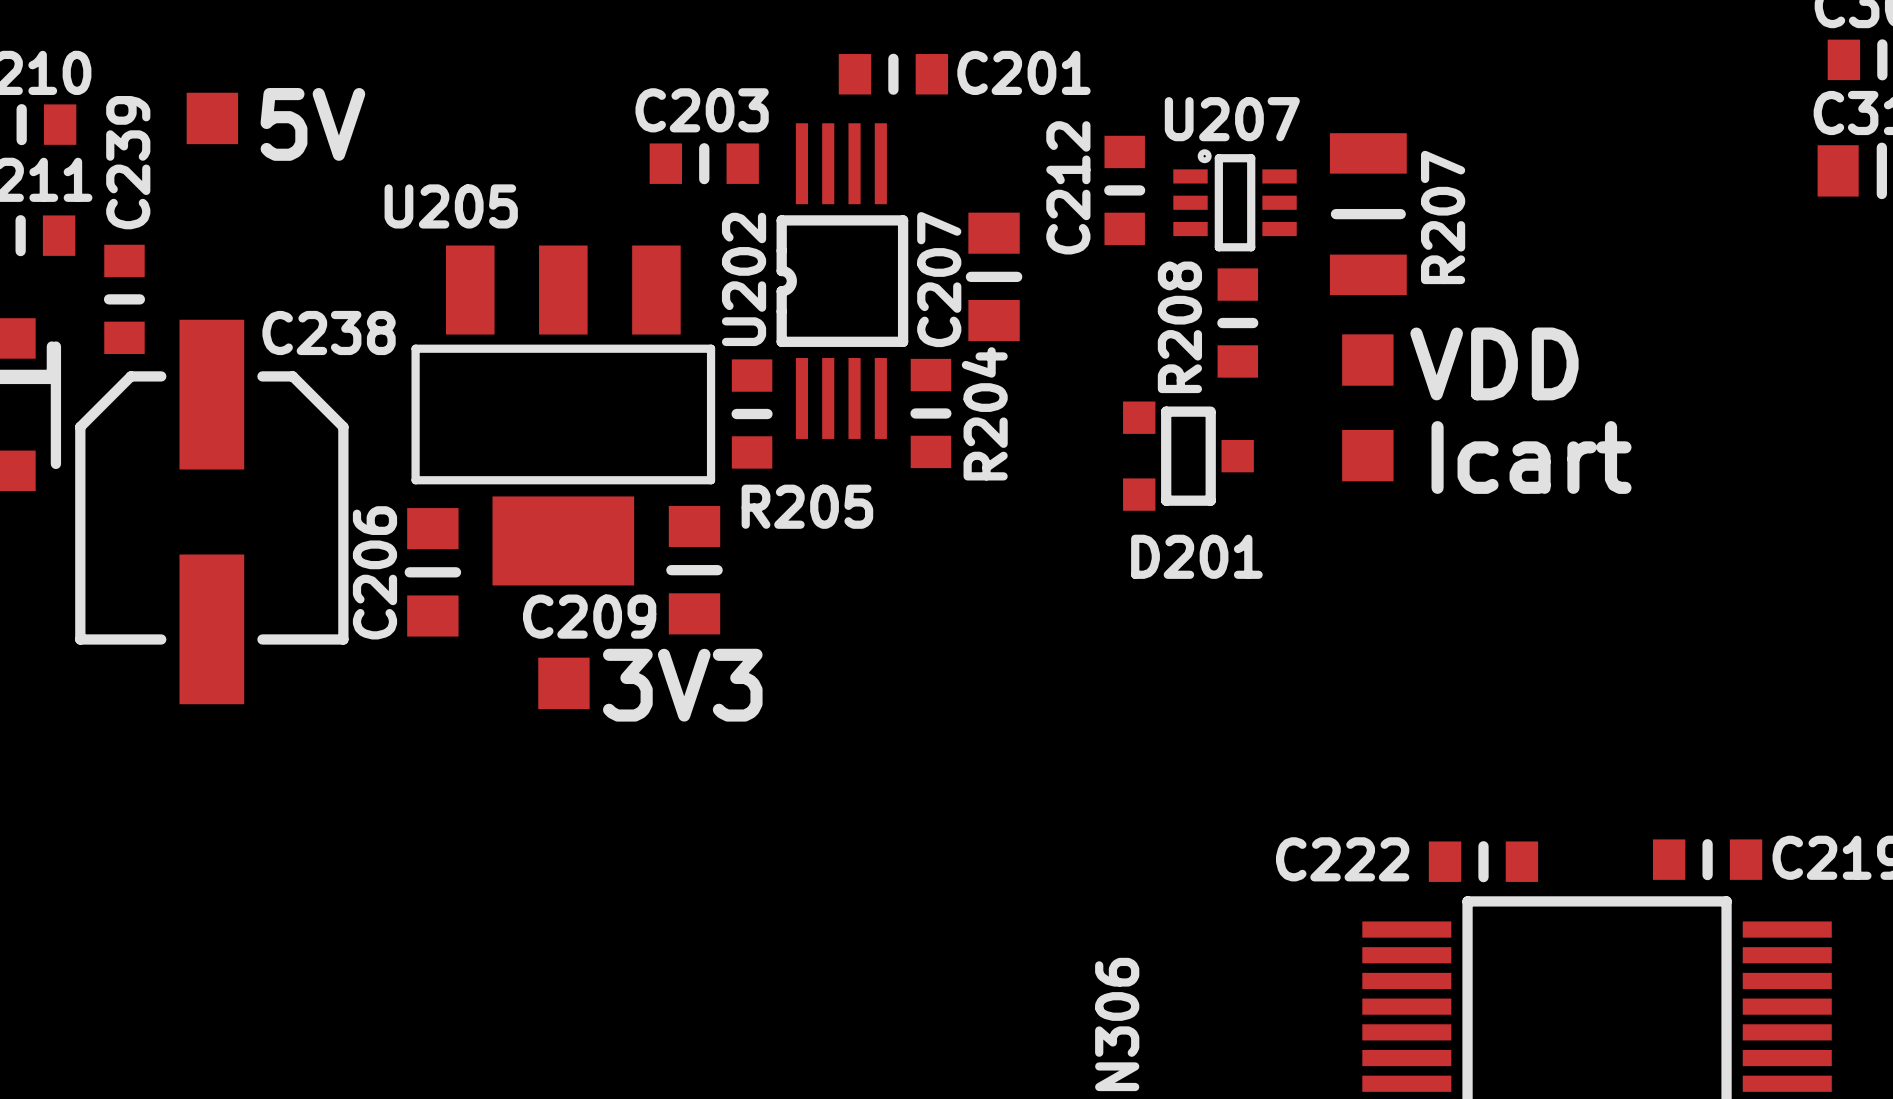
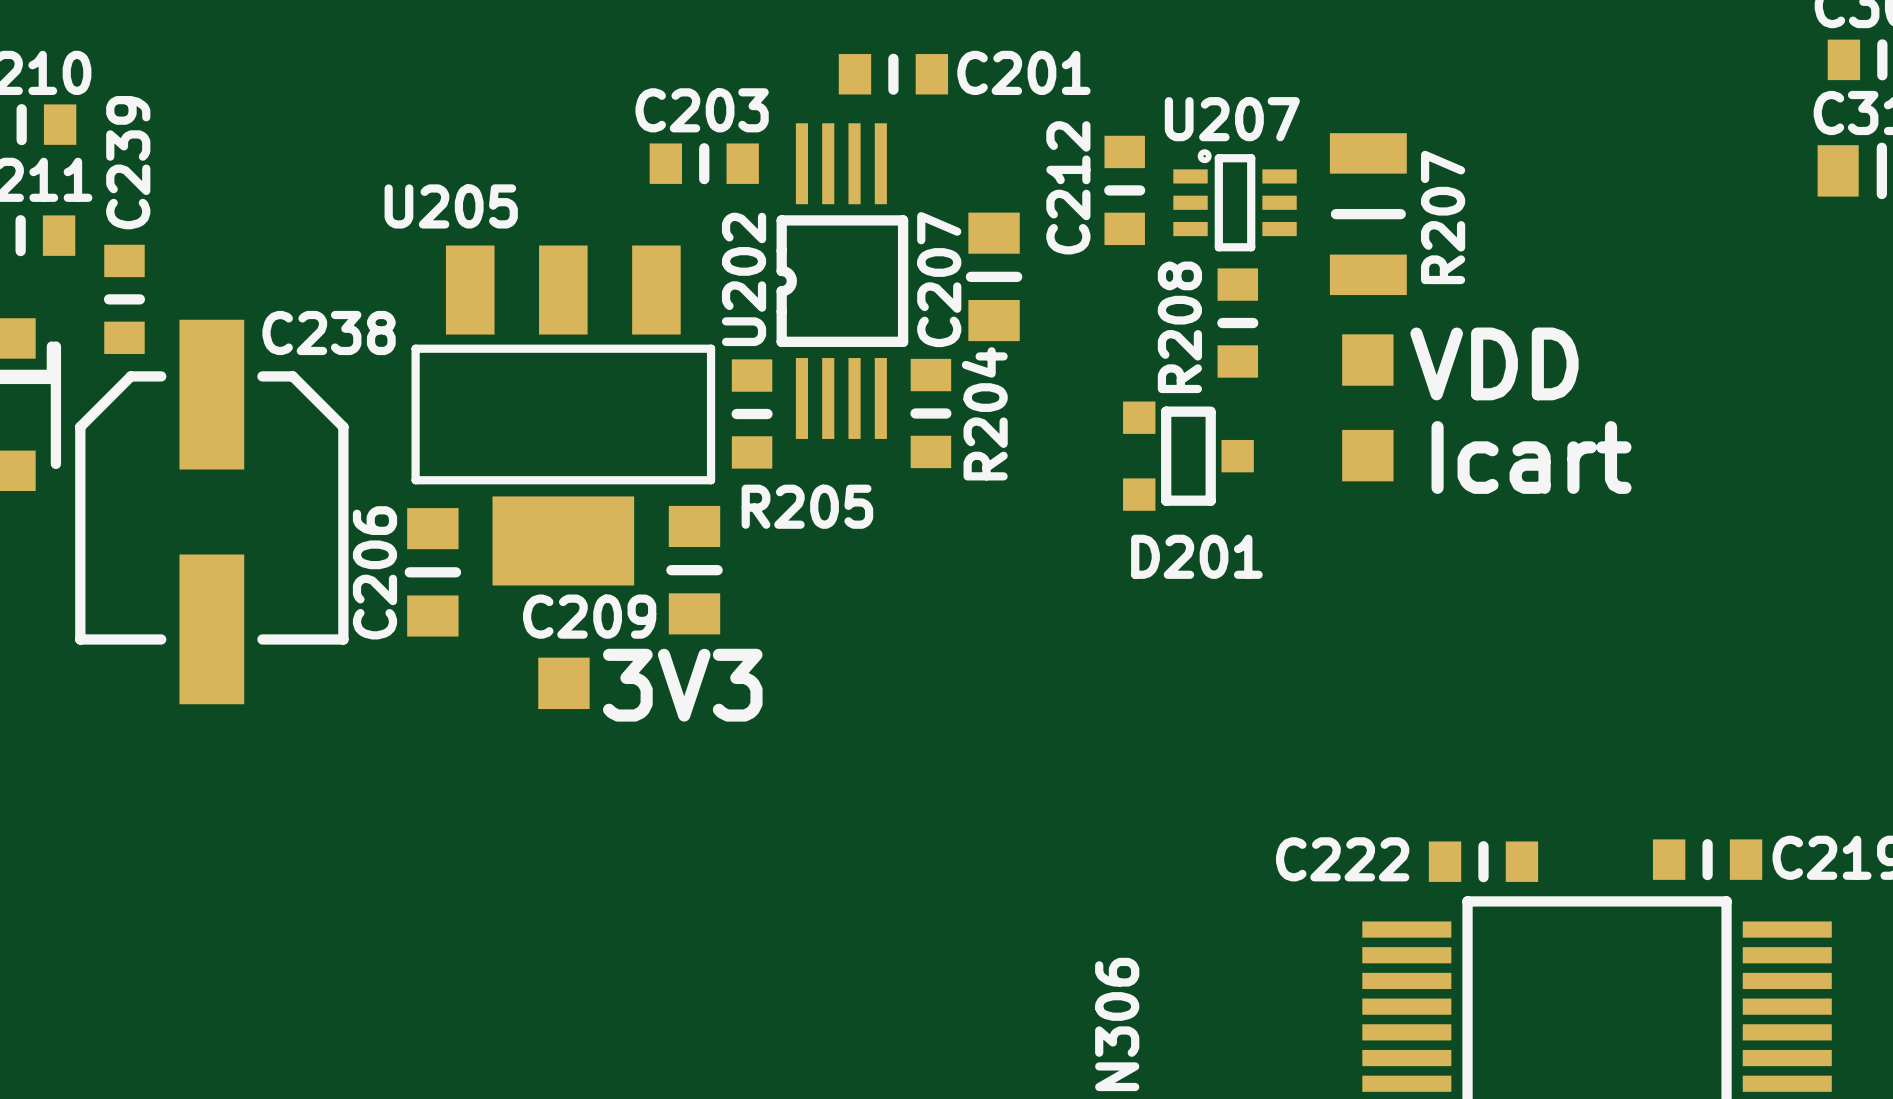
part: (212, 118) -> none
text: 5V (312, 124) -> none

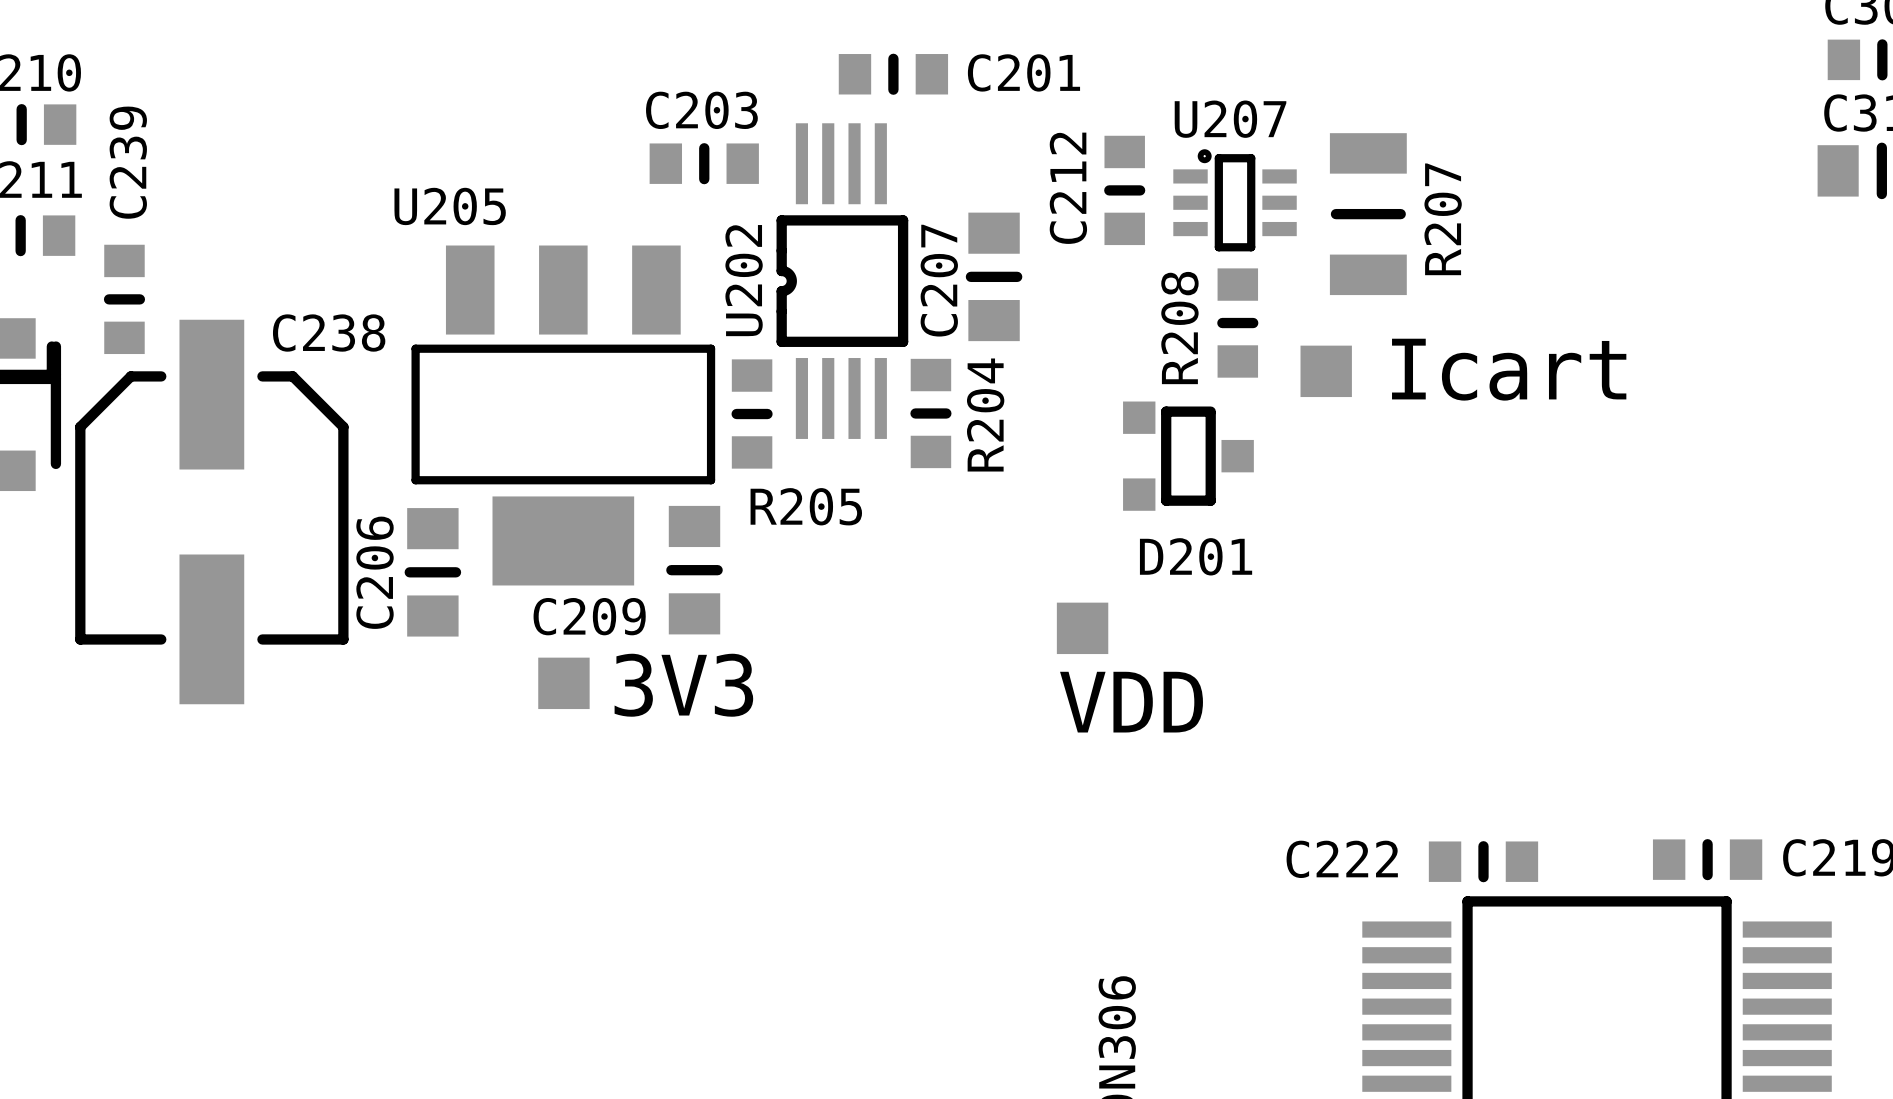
part position: (1367, 360) -> (1326, 371)
text: VDD (1494, 363) -> Icart (1509, 369)
part: (1367, 455) -> none
text: Icart (1531, 457) -> none
part: none -> (1082, 628)
text: none -> VDD (1131, 702)

